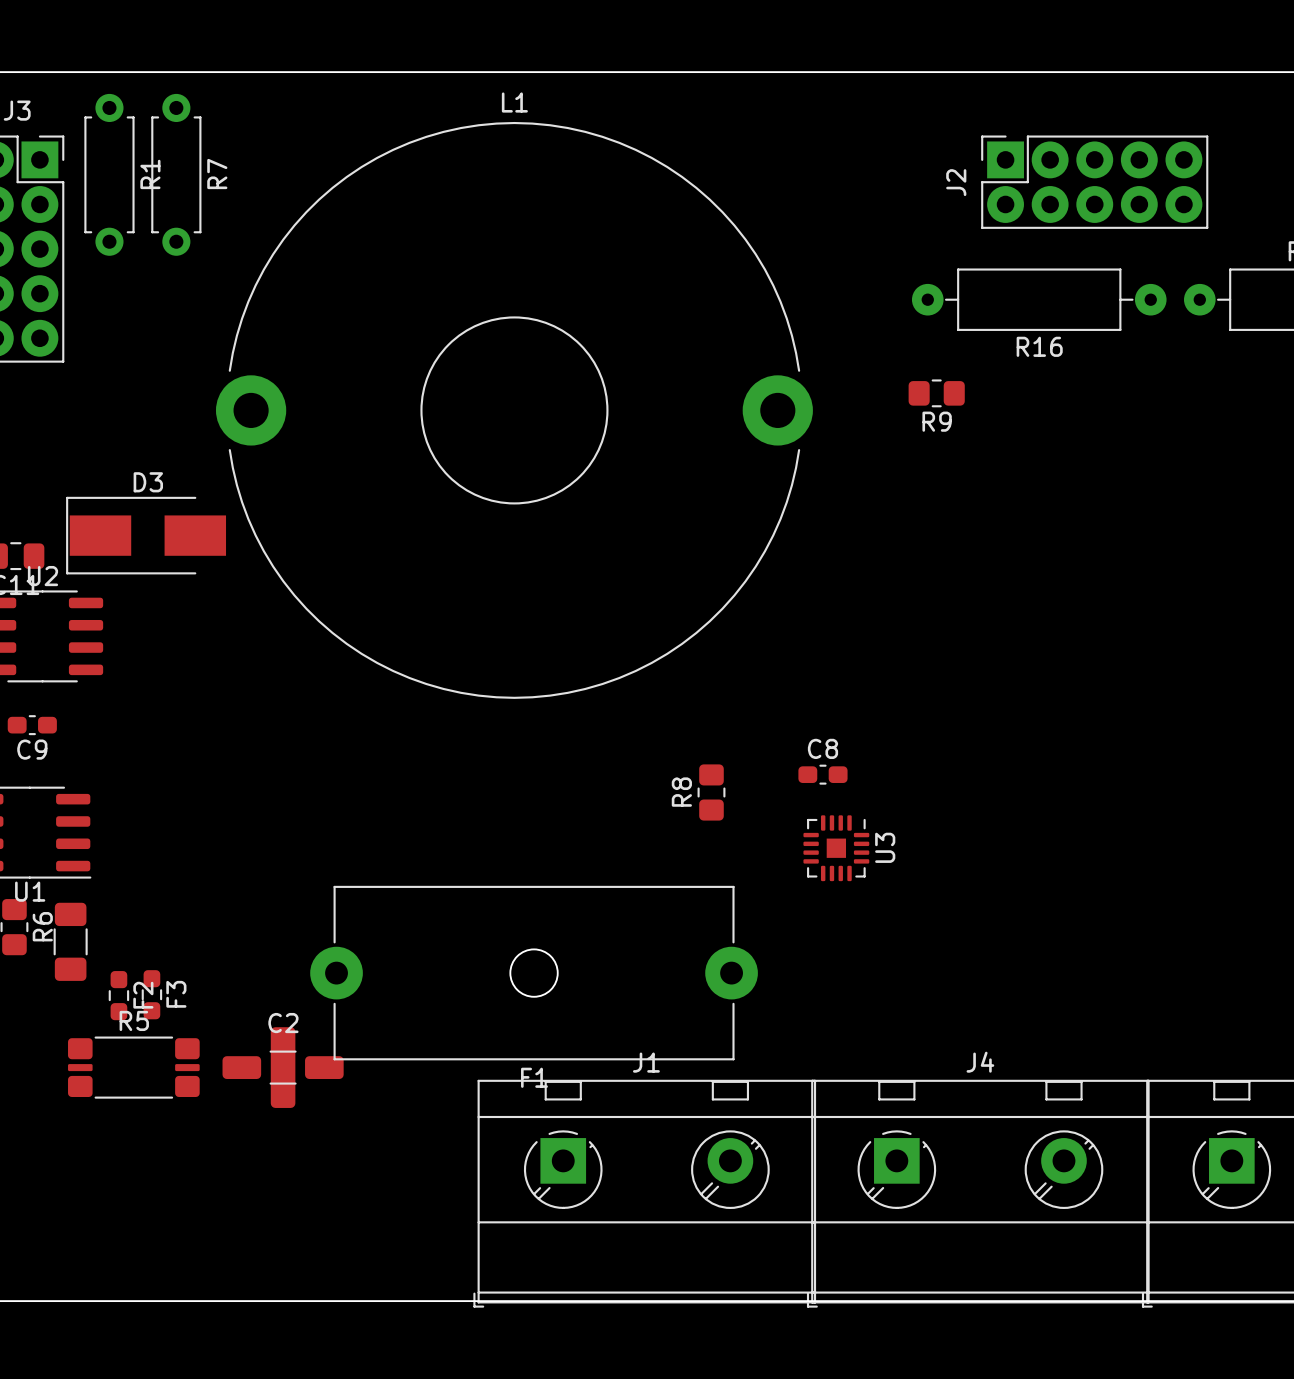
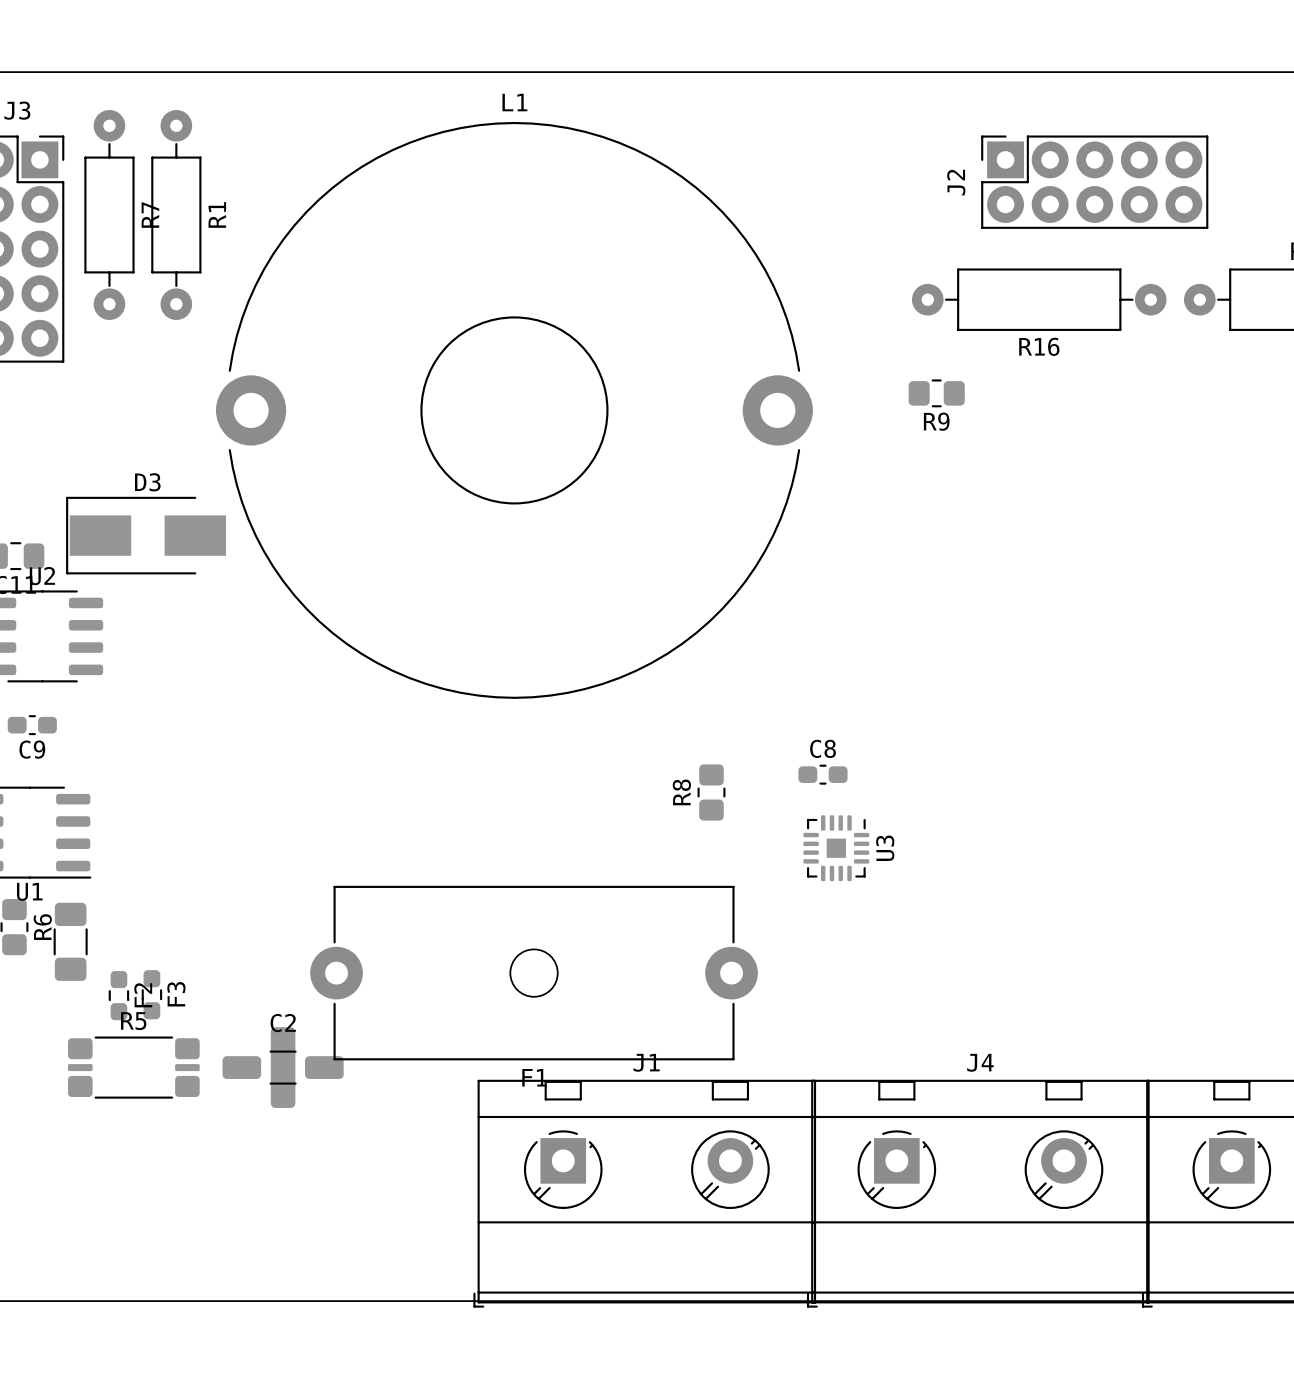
R1 footprint: [84, 93, 135, 256] -> [151, 109, 202, 320]
R7 footprint: [151, 93, 202, 256] -> [84, 109, 135, 320]

